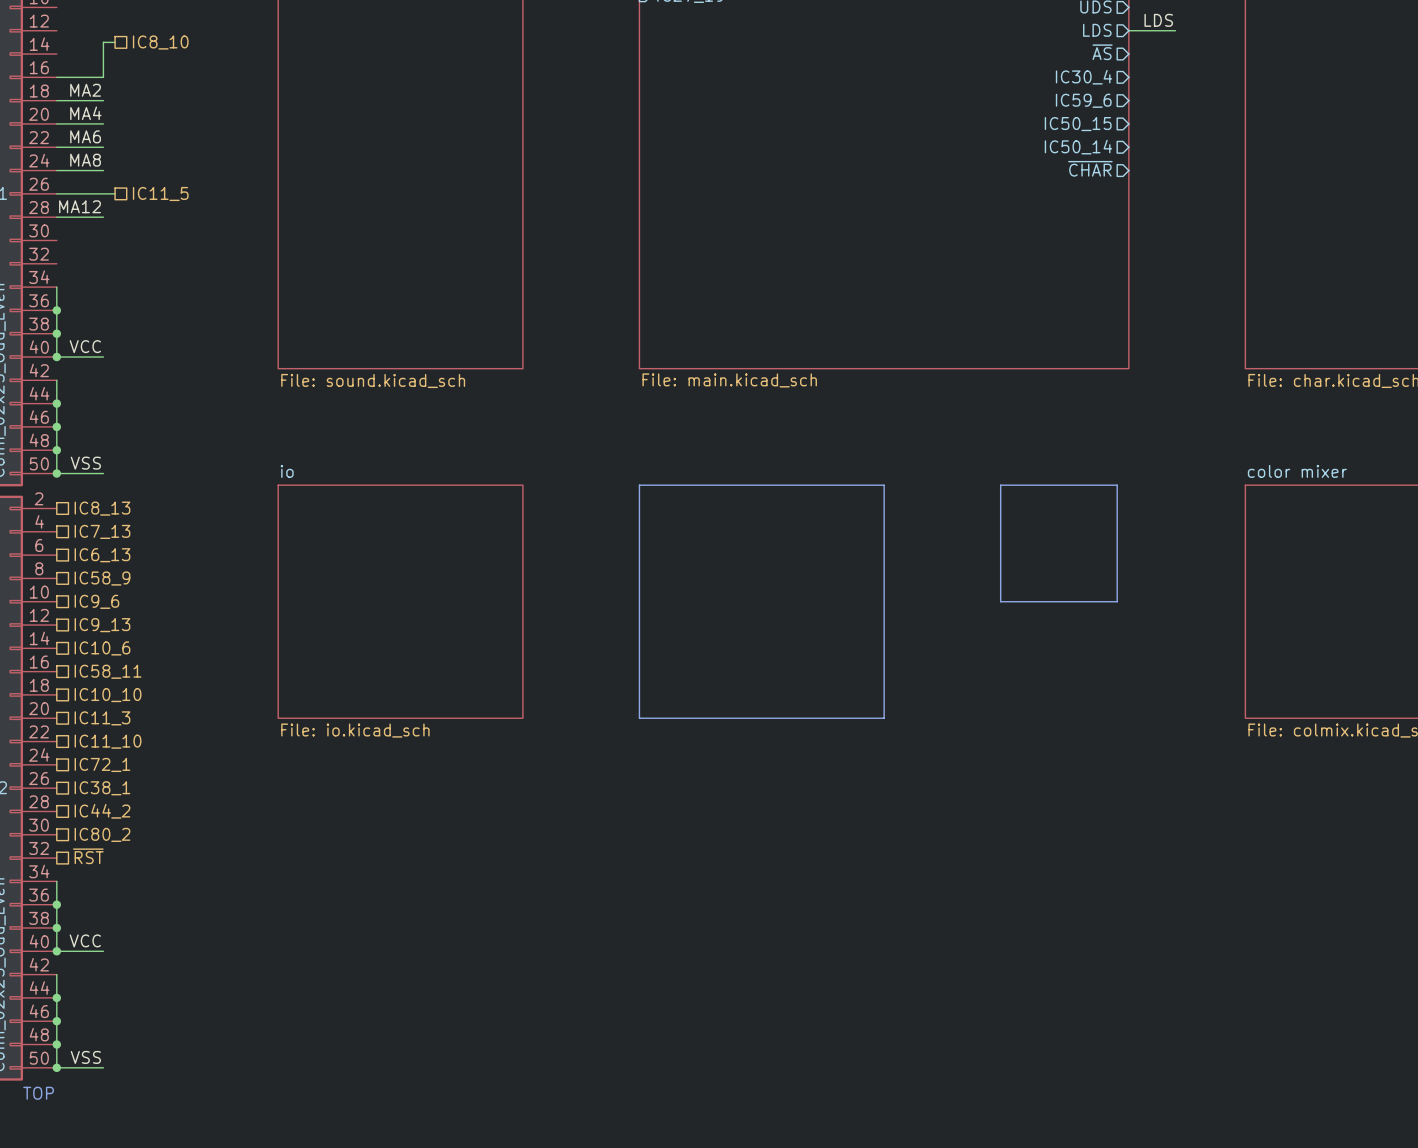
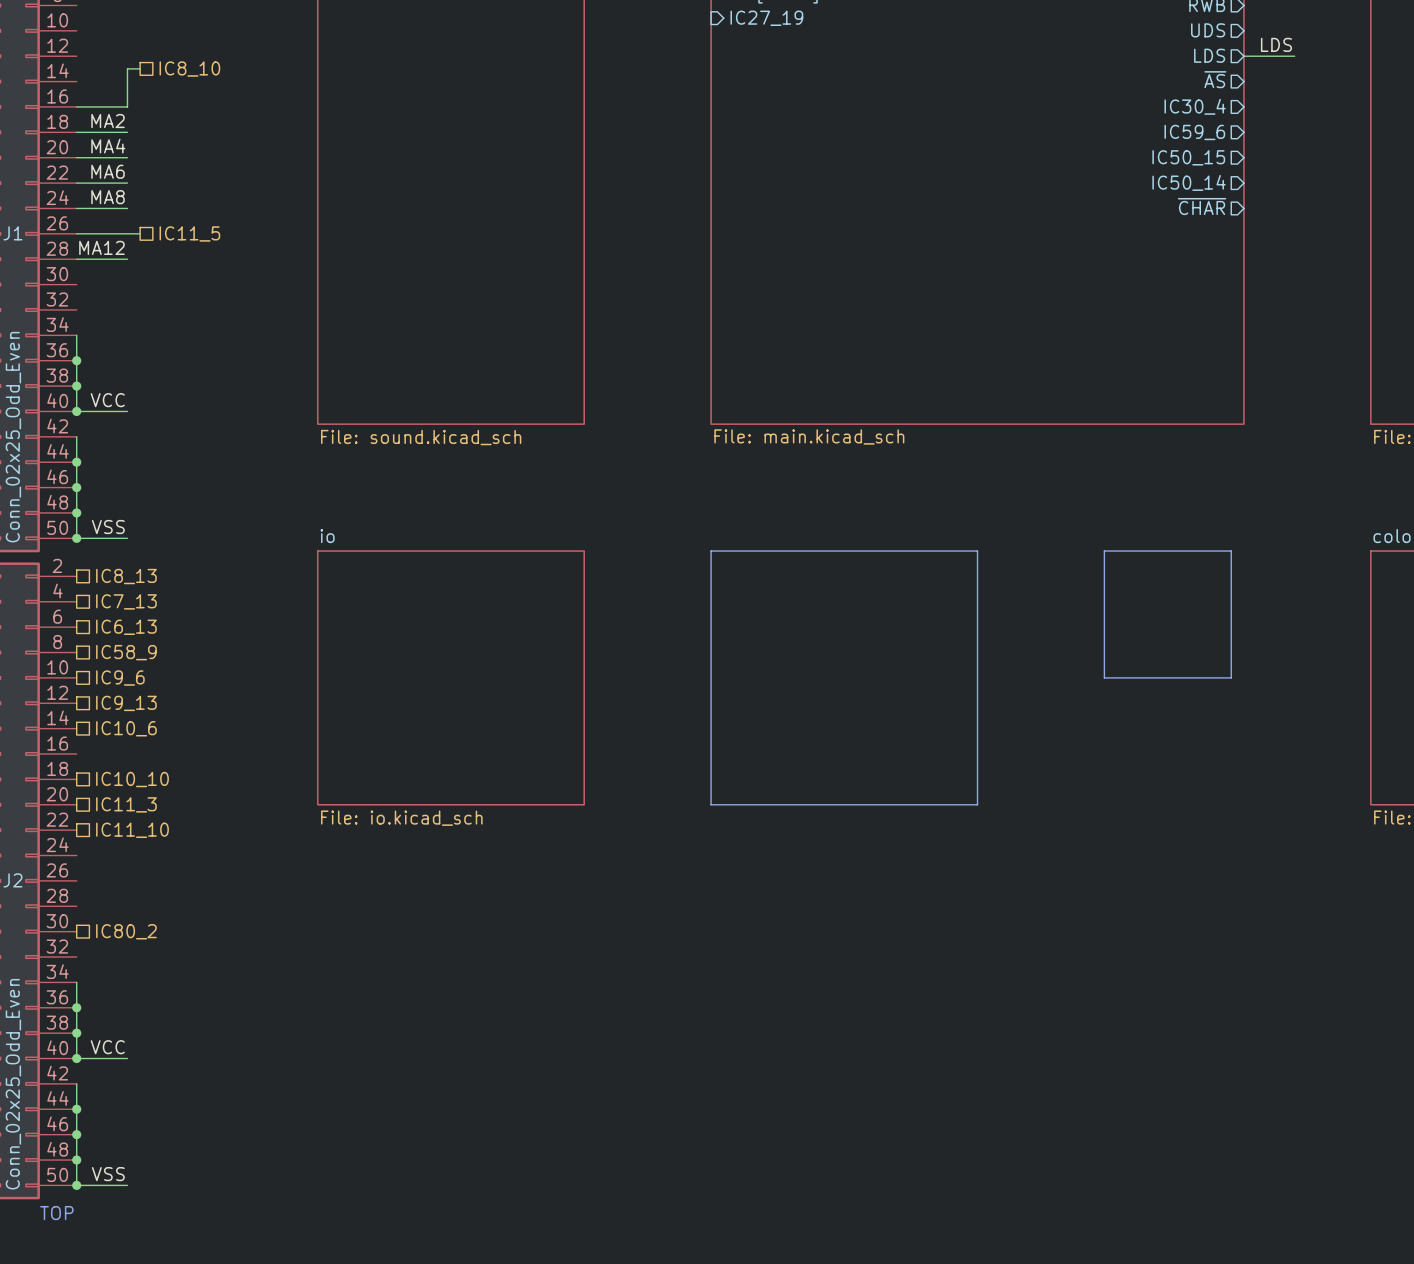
hierarchical label: IC58_11 (108, 671) -> none
hierarchical label: IC72_1 (102, 764) -> none
hierarchical label: IC38_1 (102, 788) -> none
hierarchical label: IC44_2 (102, 811) -> none
hierarchical label: ~{RST} (88, 856) -> none

